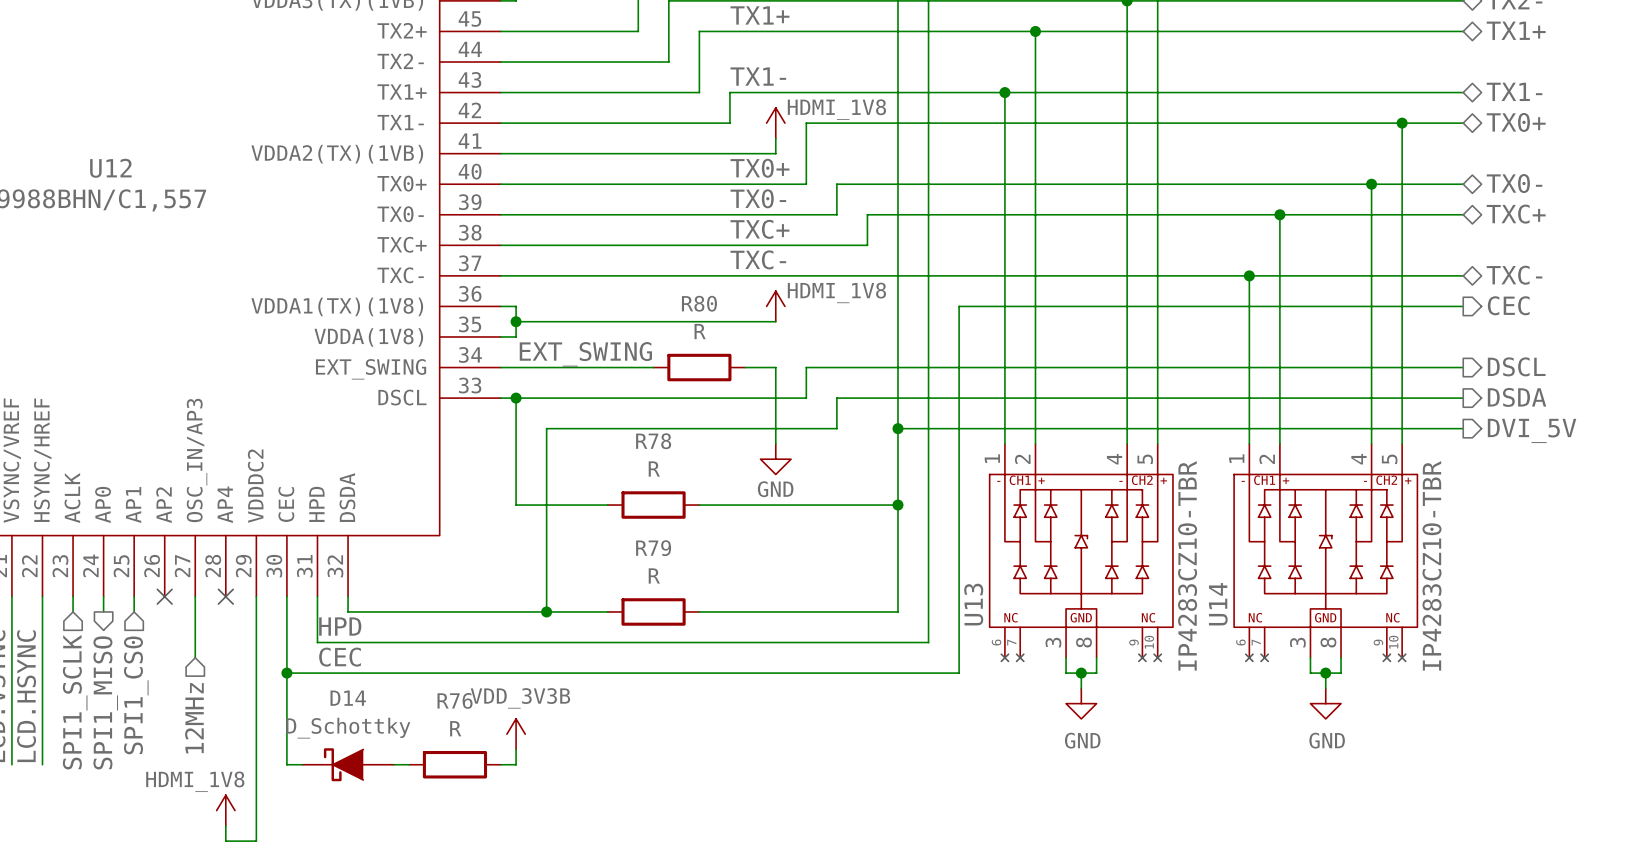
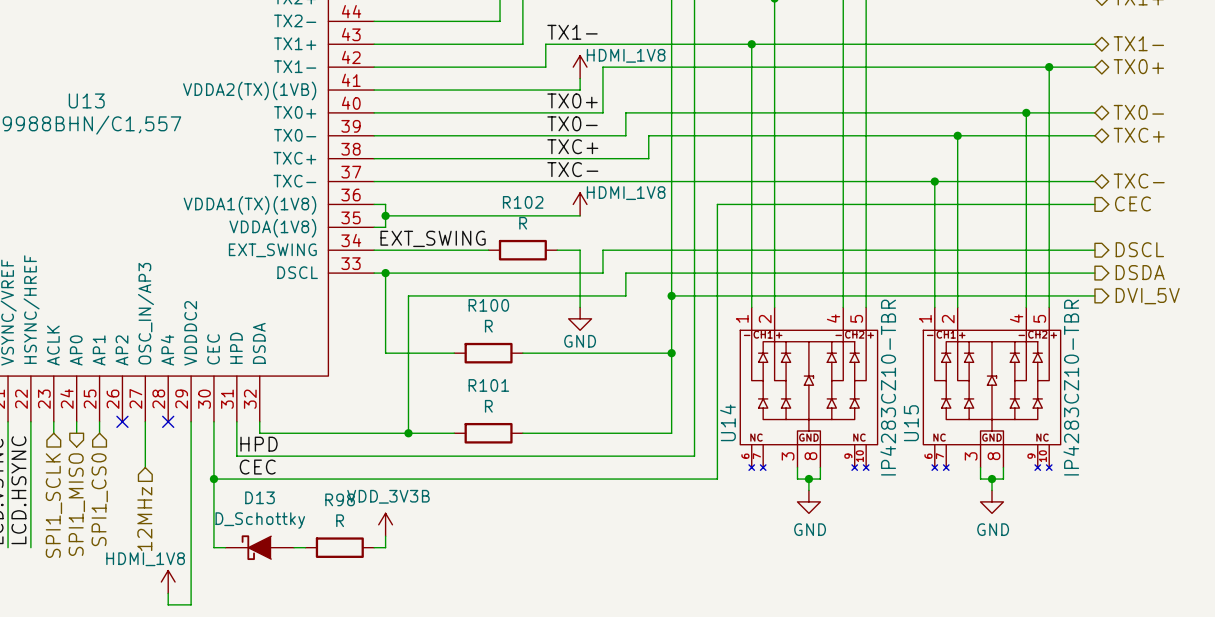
U12 name: U12 (110, 168) -> U13 (86, 100)
R80 name: R80 (699, 303) -> R102 (523, 202)
R78 name: R78 (653, 441) -> R100 (488, 305)
R79 name: R79 (653, 548) -> R101 (488, 385)
U13 name: U13 (973, 604) -> U14 (728, 422)
U14 name: U14 (1218, 604) -> U15 (911, 423)
D14 name: D14 (348, 698) -> D13 (260, 497)
R76 name: R76 (455, 700) -> R98 (340, 499)

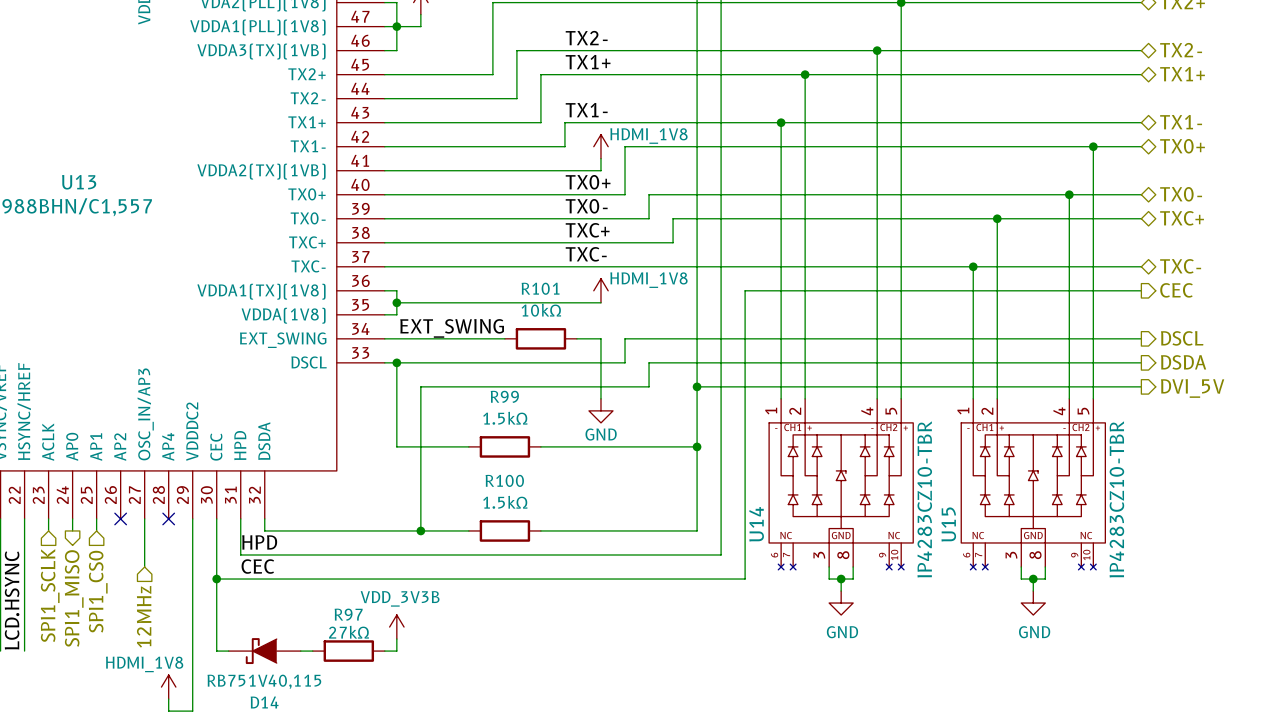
R102 name: R102 (523, 202) -> R101 (540, 288)
R102 value: R (523, 223) -> 10kΩ (541, 310)
R100 name: R100 (488, 305) -> R99 (504, 396)
R100 value: R (488, 326) -> 1.5kΩ (505, 418)
R101 name: R101 (488, 385) -> R100 (504, 480)
R101 value: R (488, 406) -> 1.5kΩ (505, 502)
R98 name: R98 (340, 499) -> R97 (348, 614)
R98 value: R (340, 520) -> 27kΩ (349, 632)
D13: D_Schottky (259, 547) -> none
D14: none -> RB751V40,115 (264, 651)

